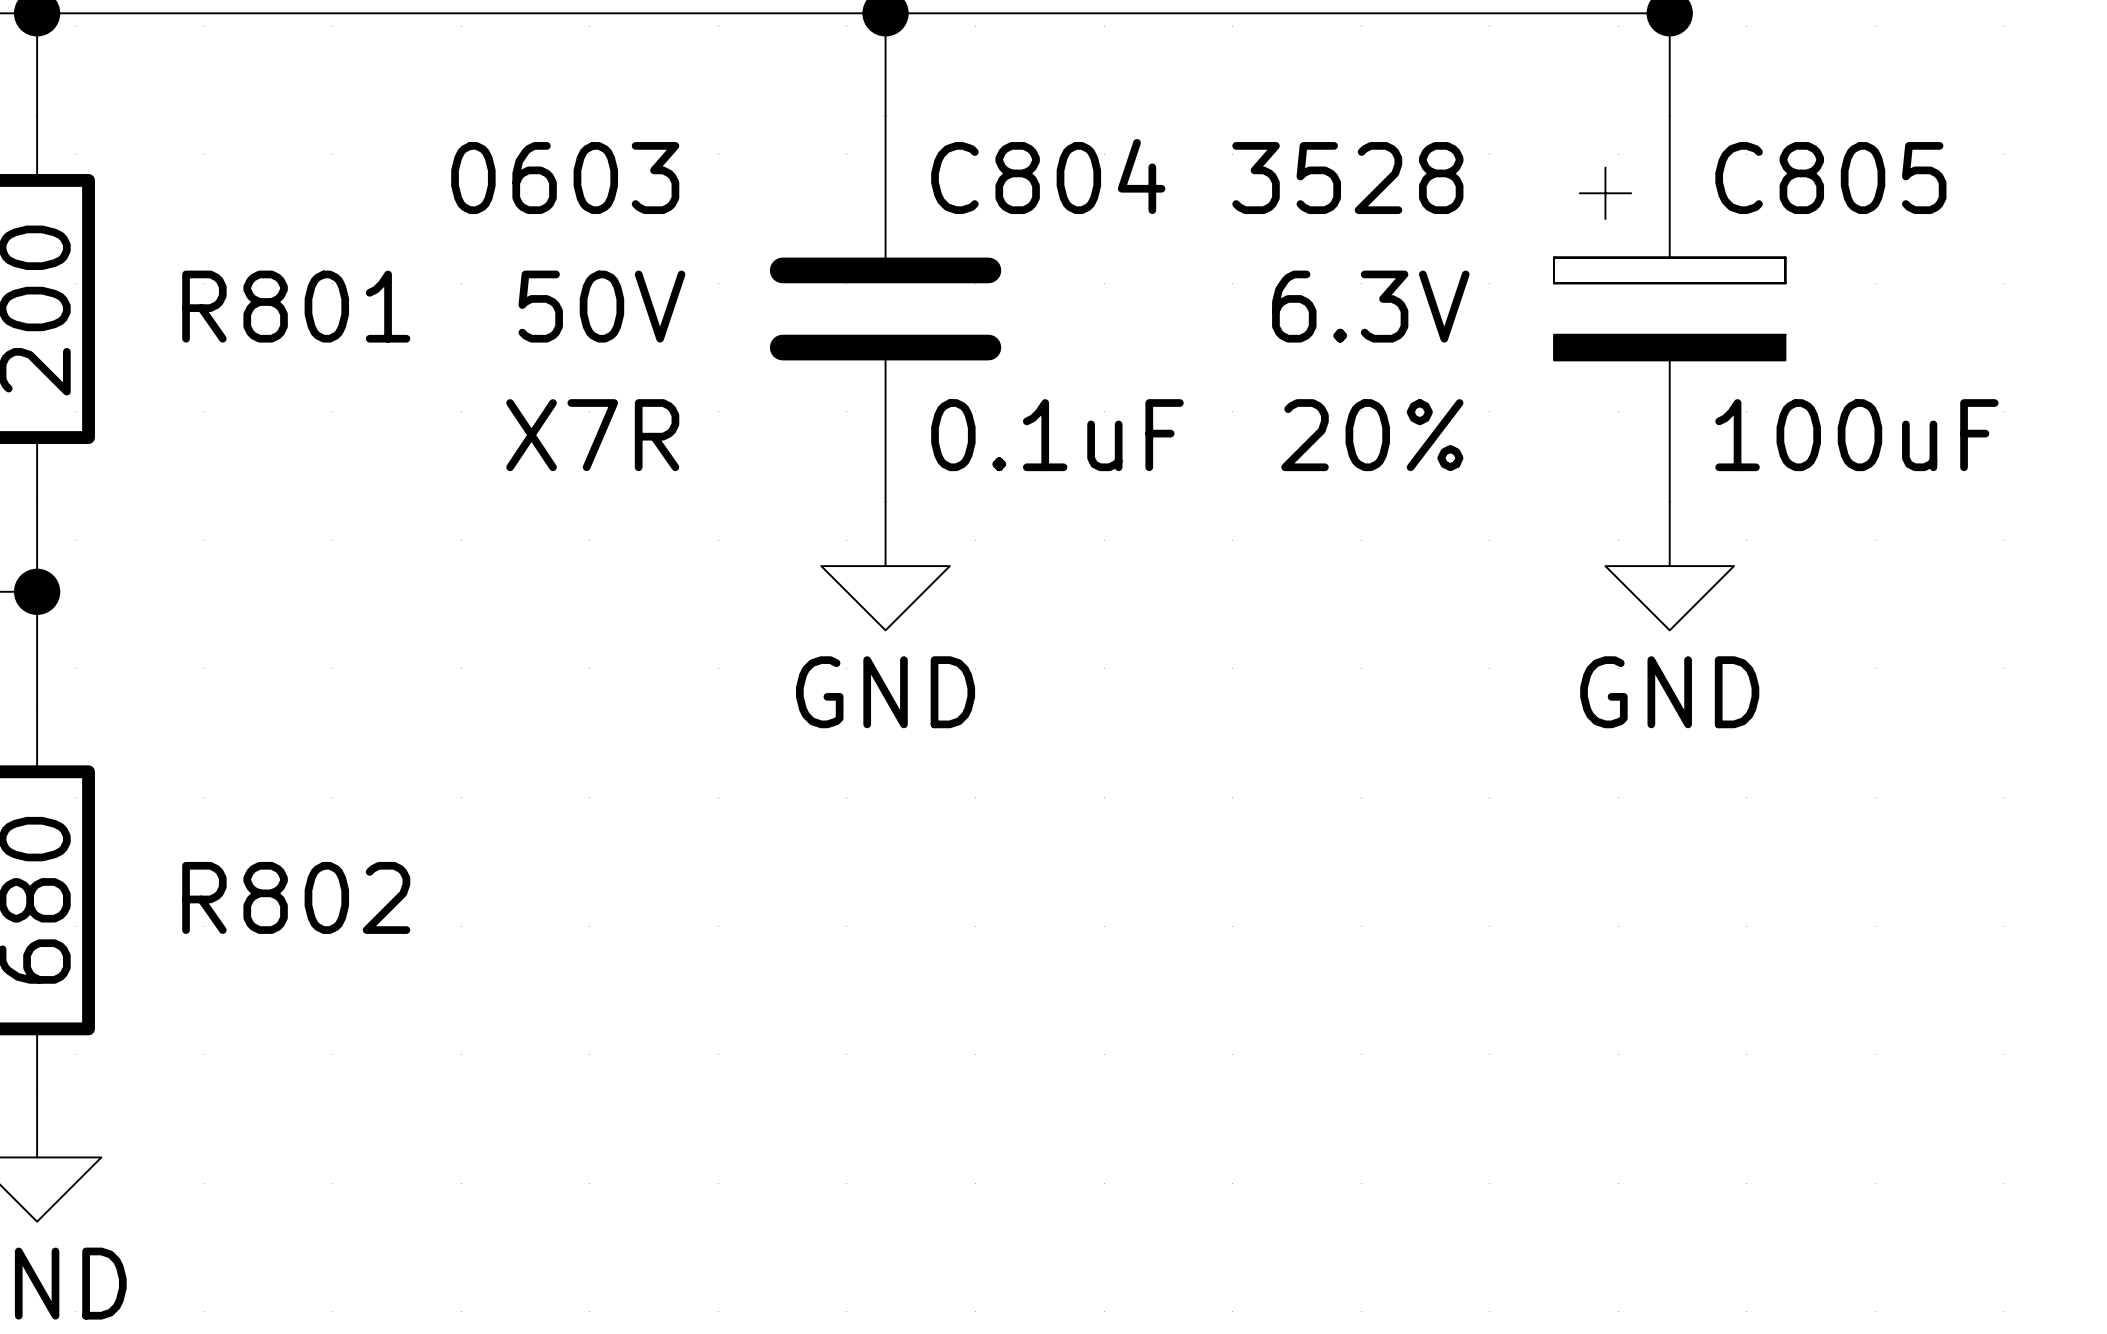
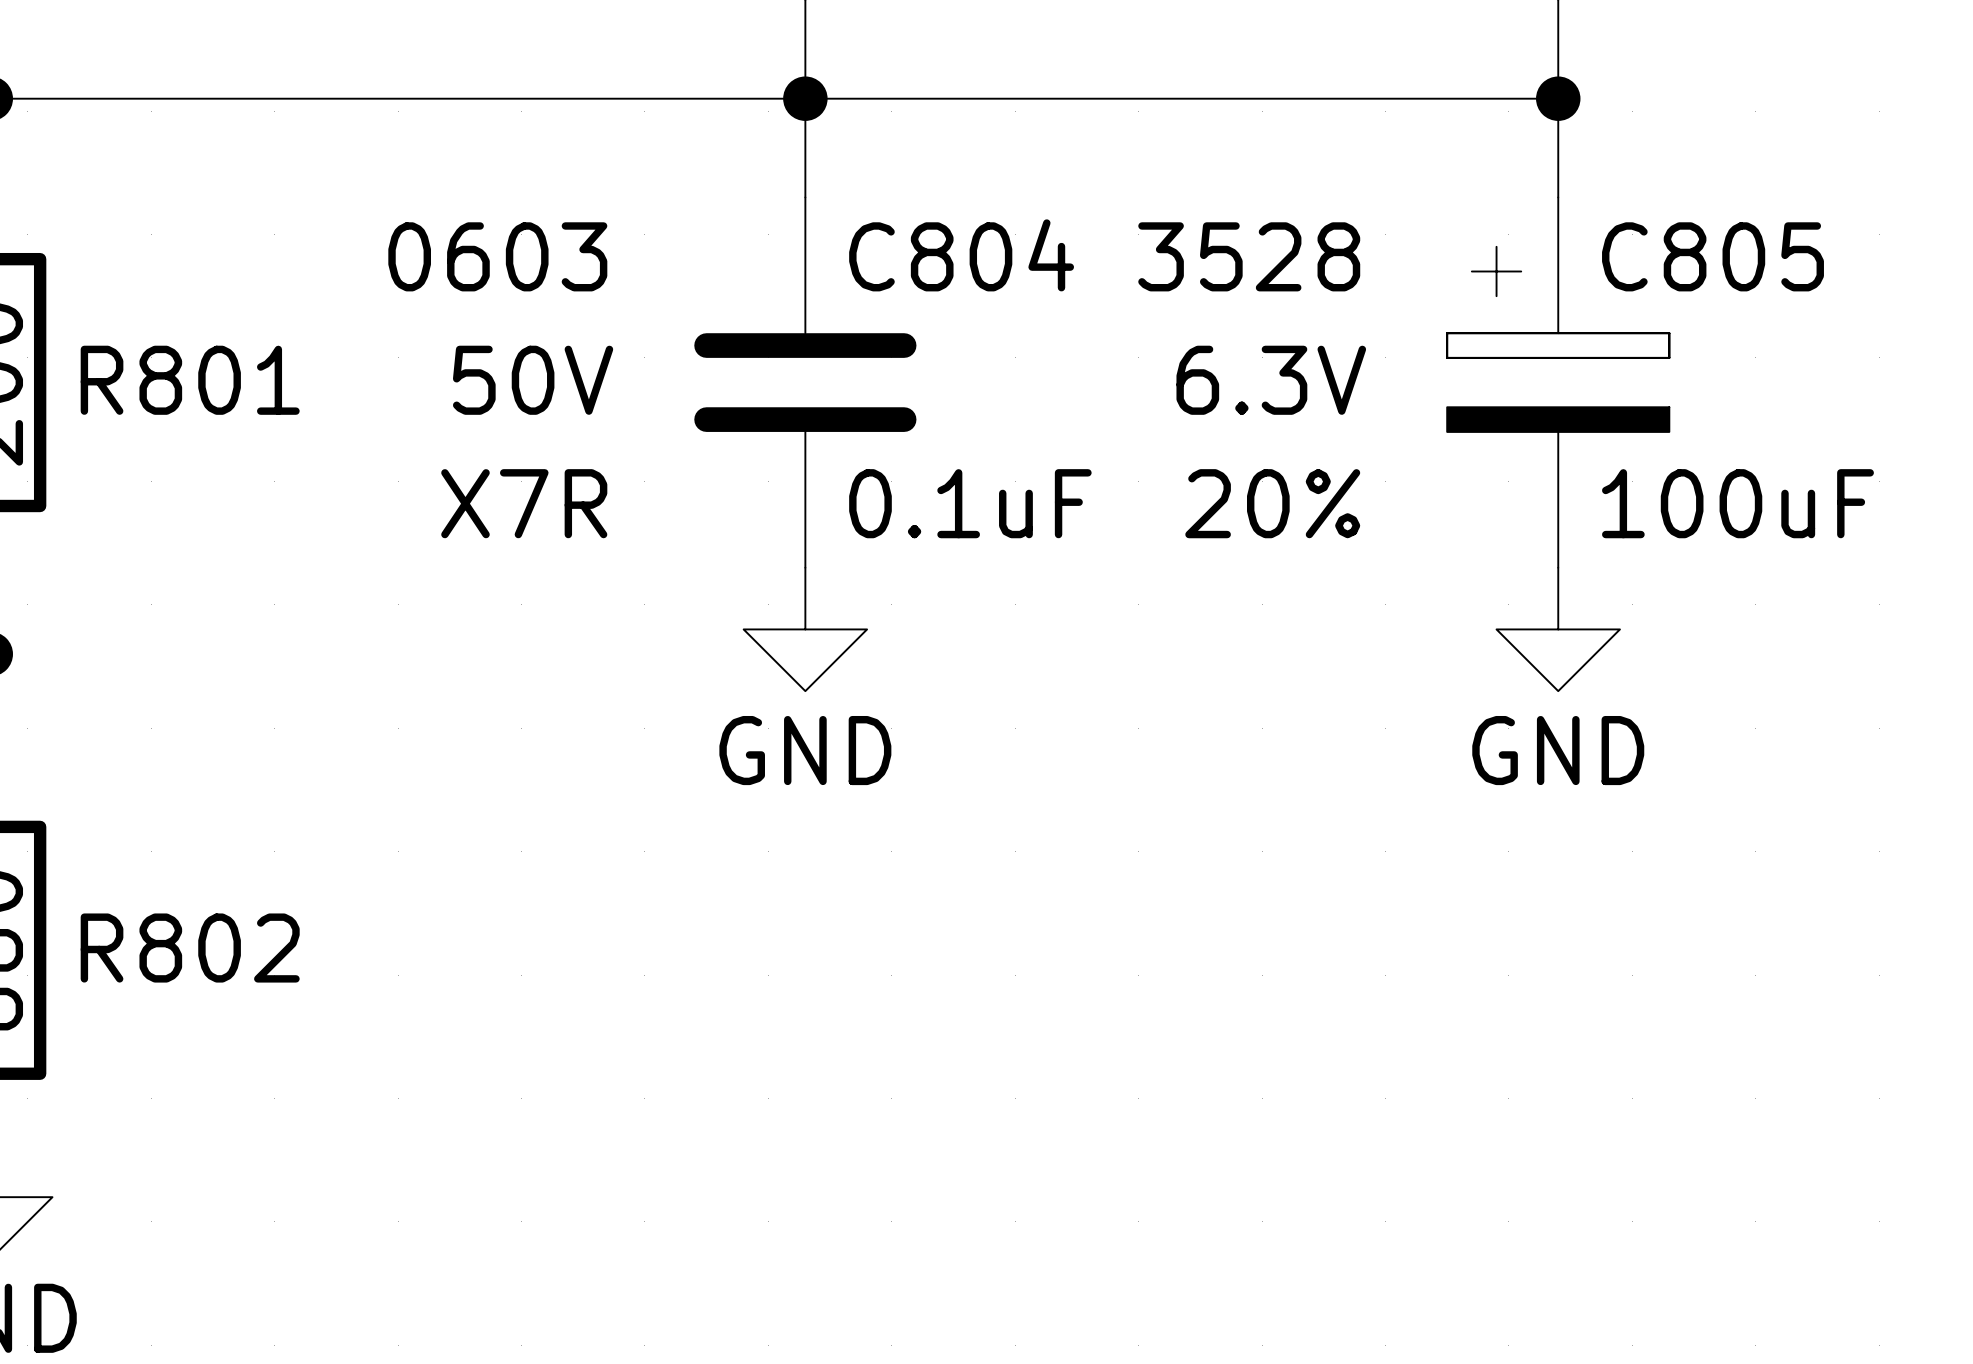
R801 name position: R801 (296, 306) -> R801 (190, 380)
R802 name position: R802 (296, 897) -> R802 (190, 948)

